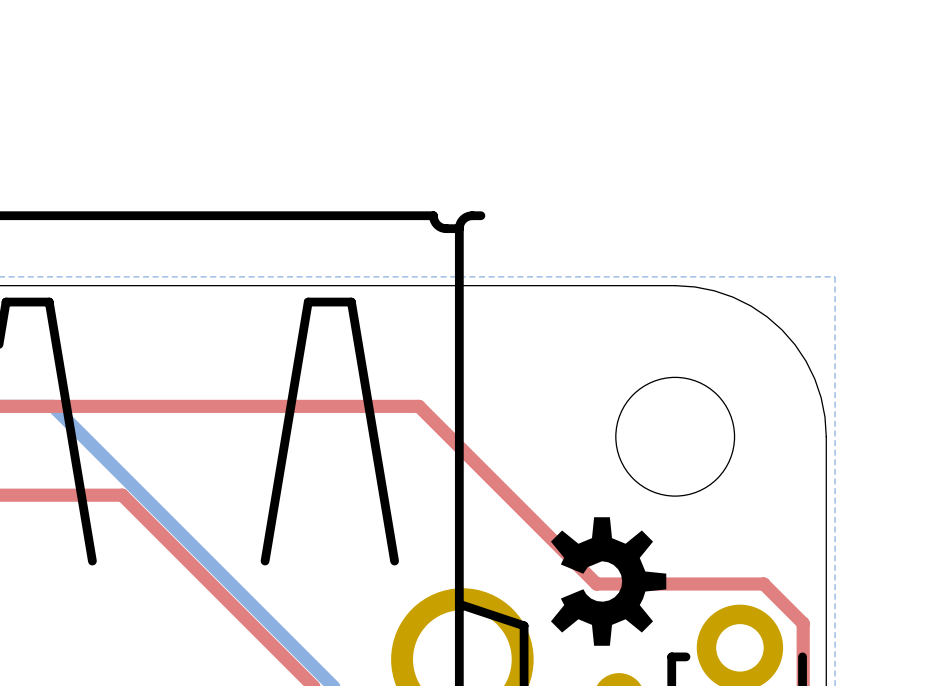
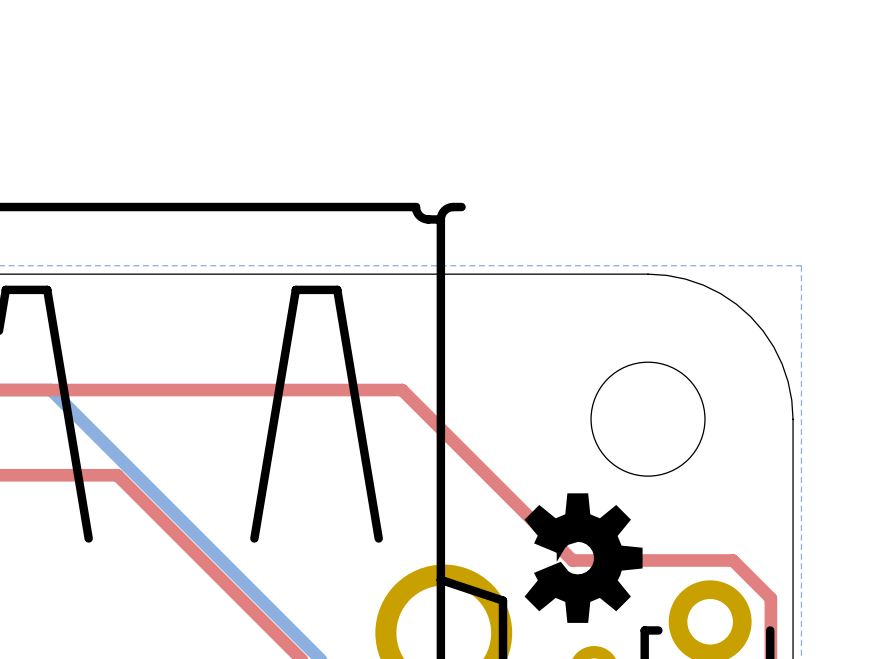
drawing shape: [550, 517, 667, 646] -> [524, 493, 643, 623]

